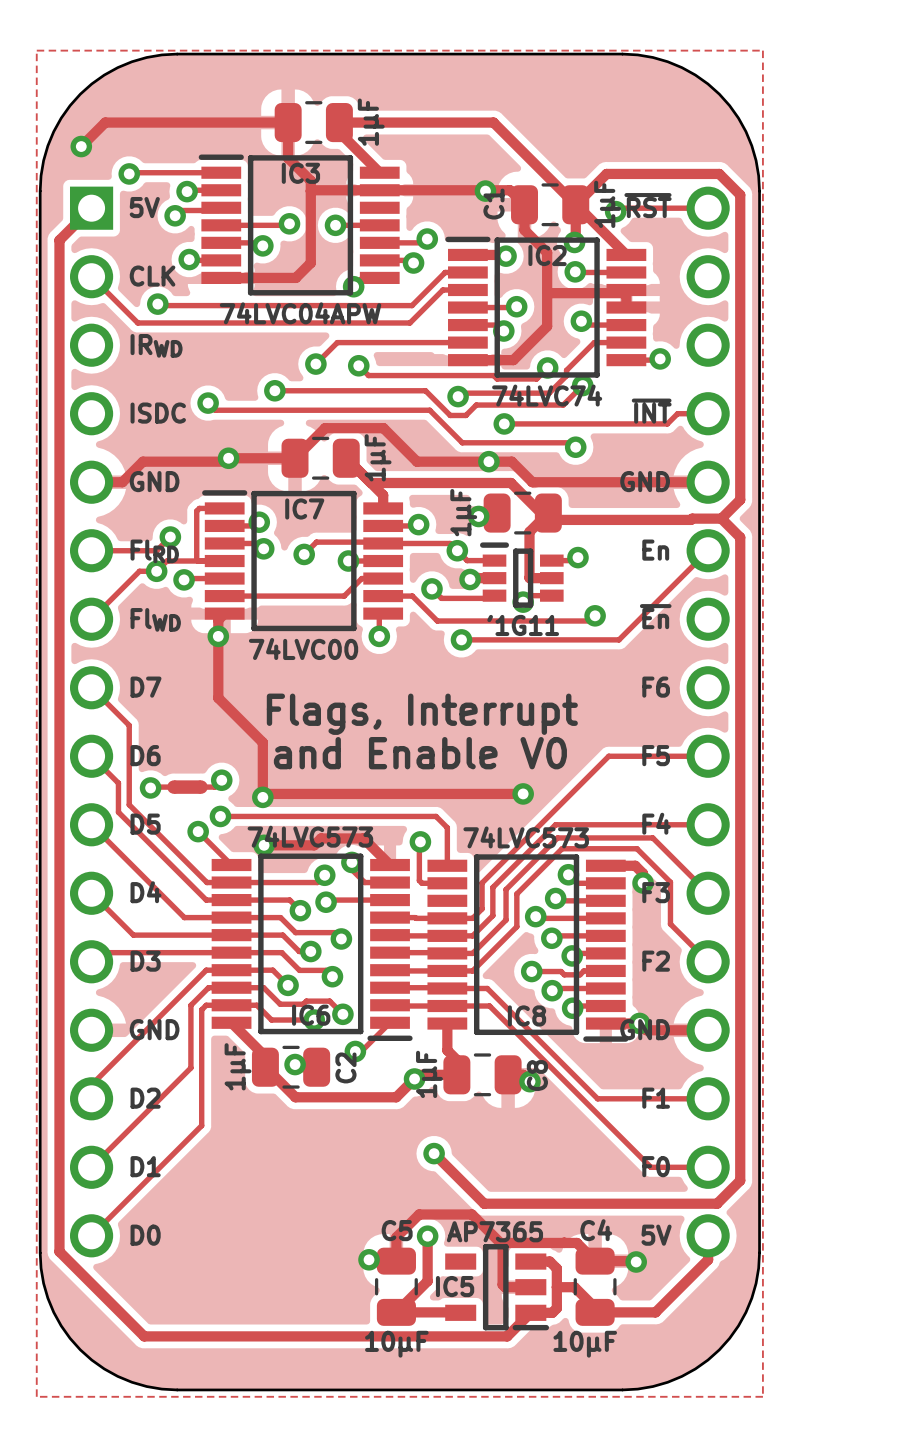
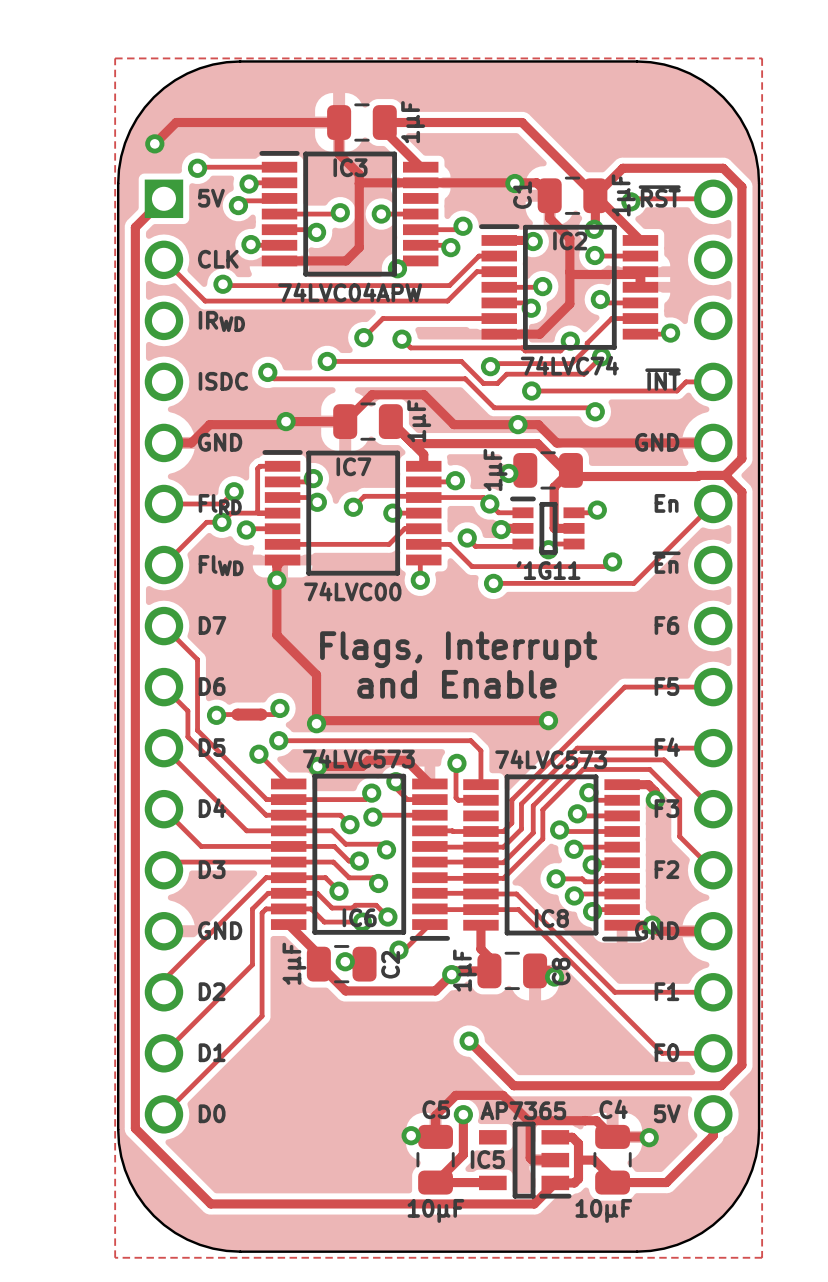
text: and Enable V0 (420, 753) -> and Enable (456, 684)

